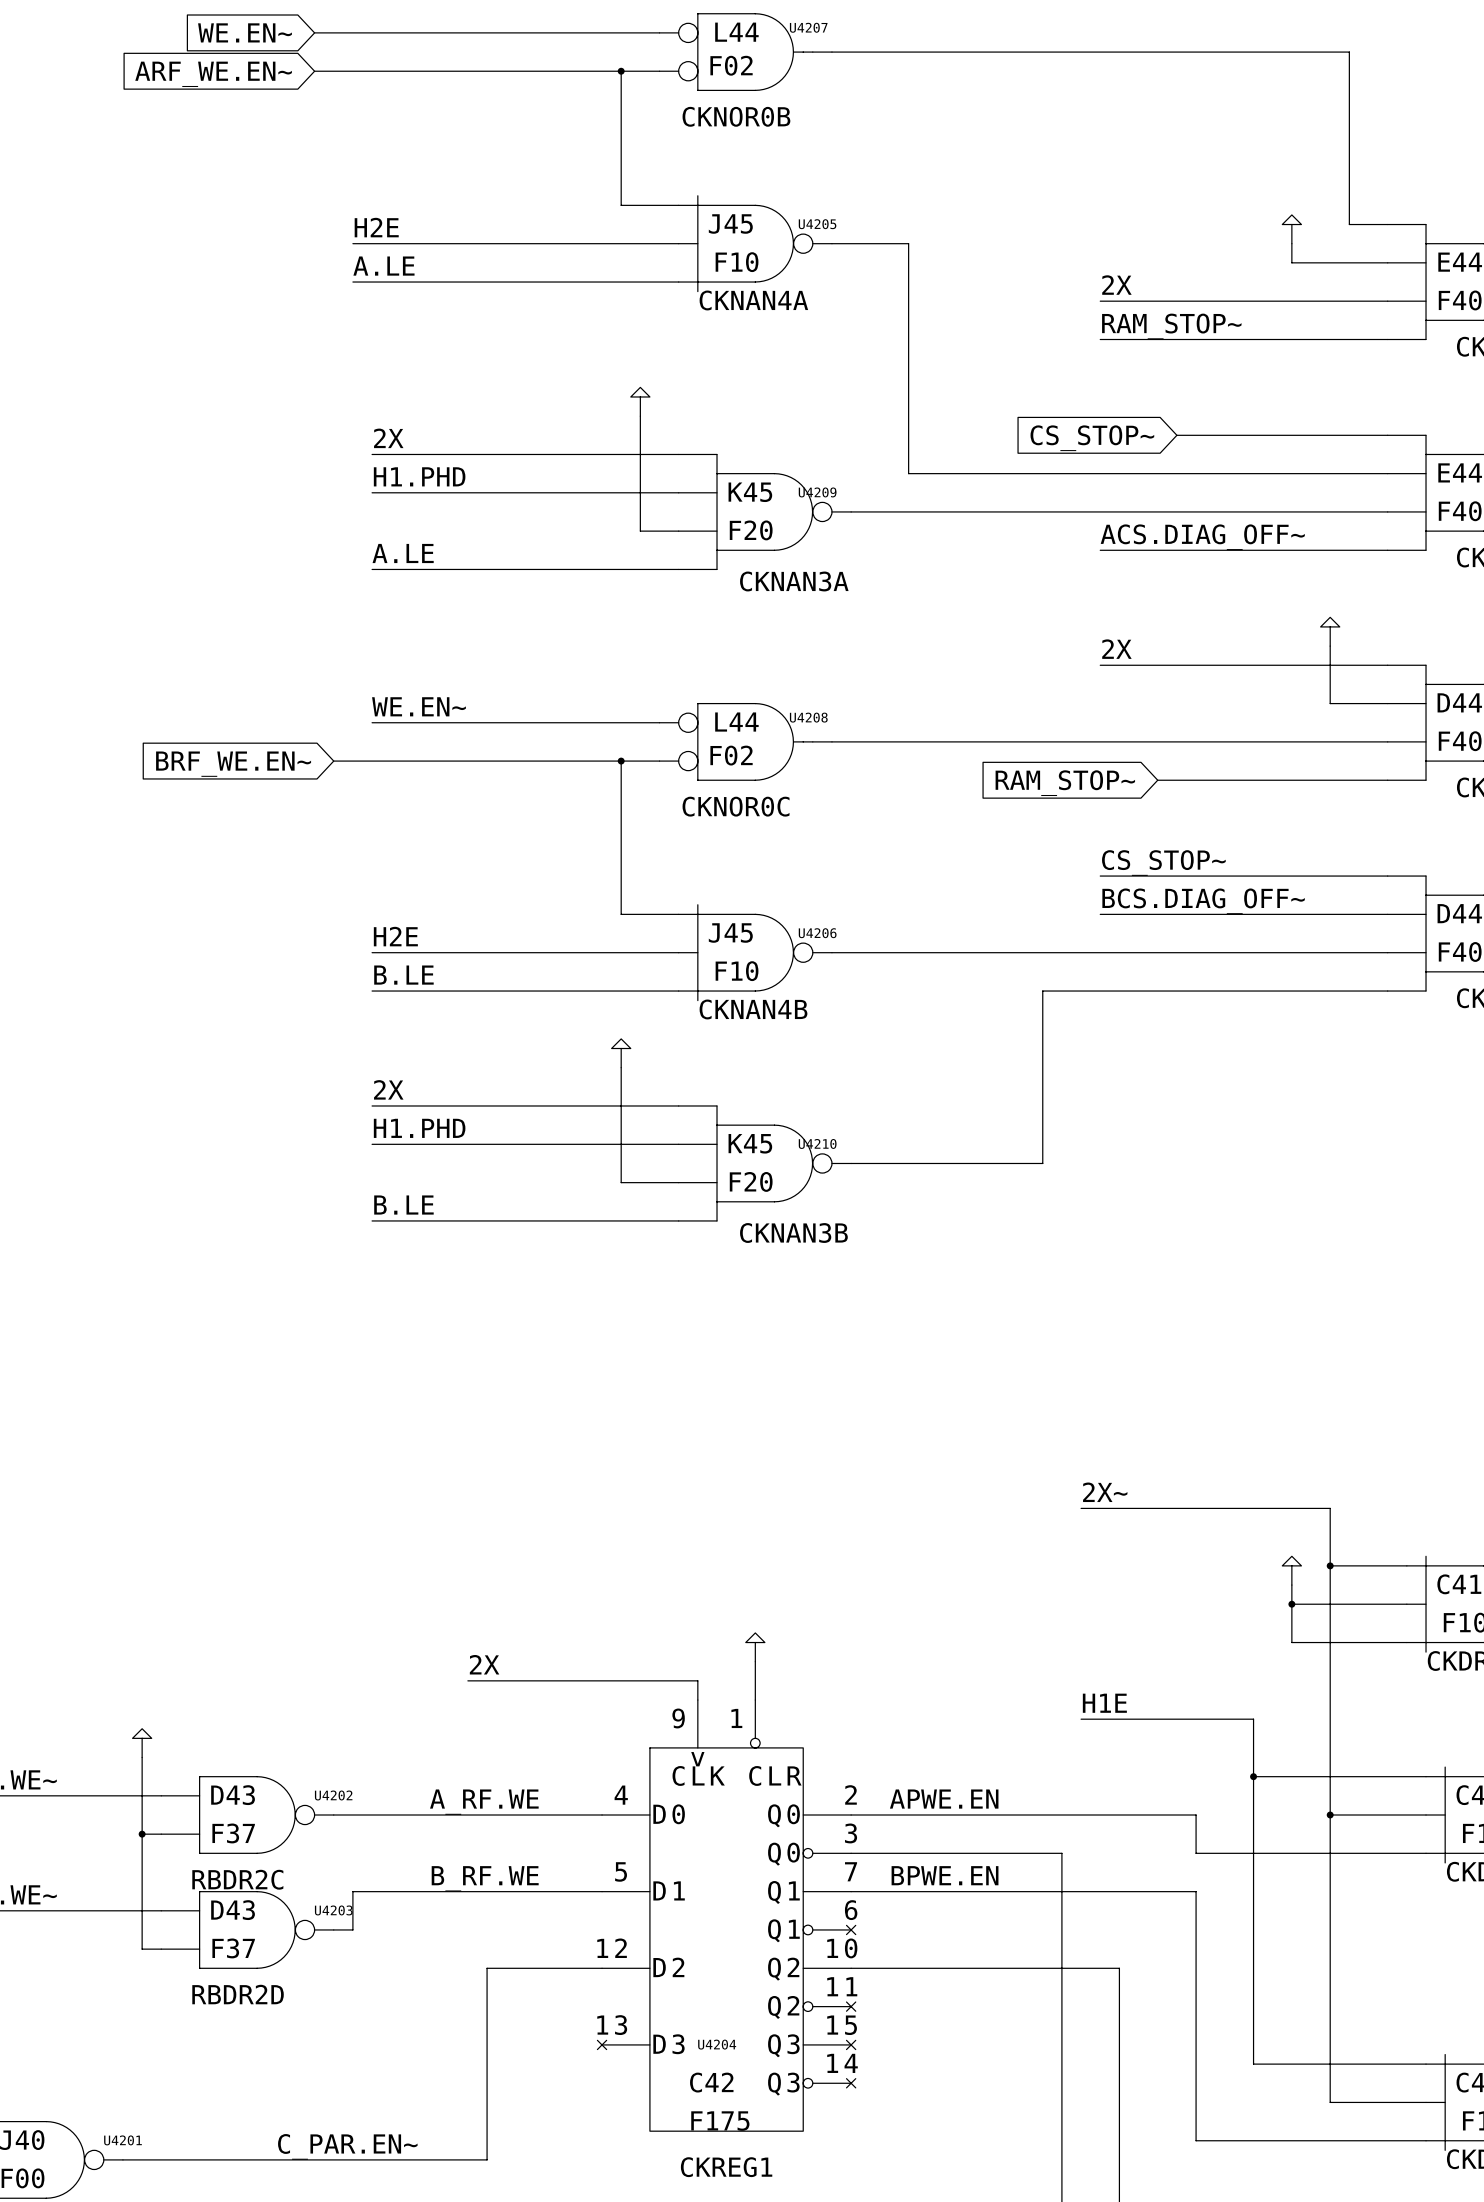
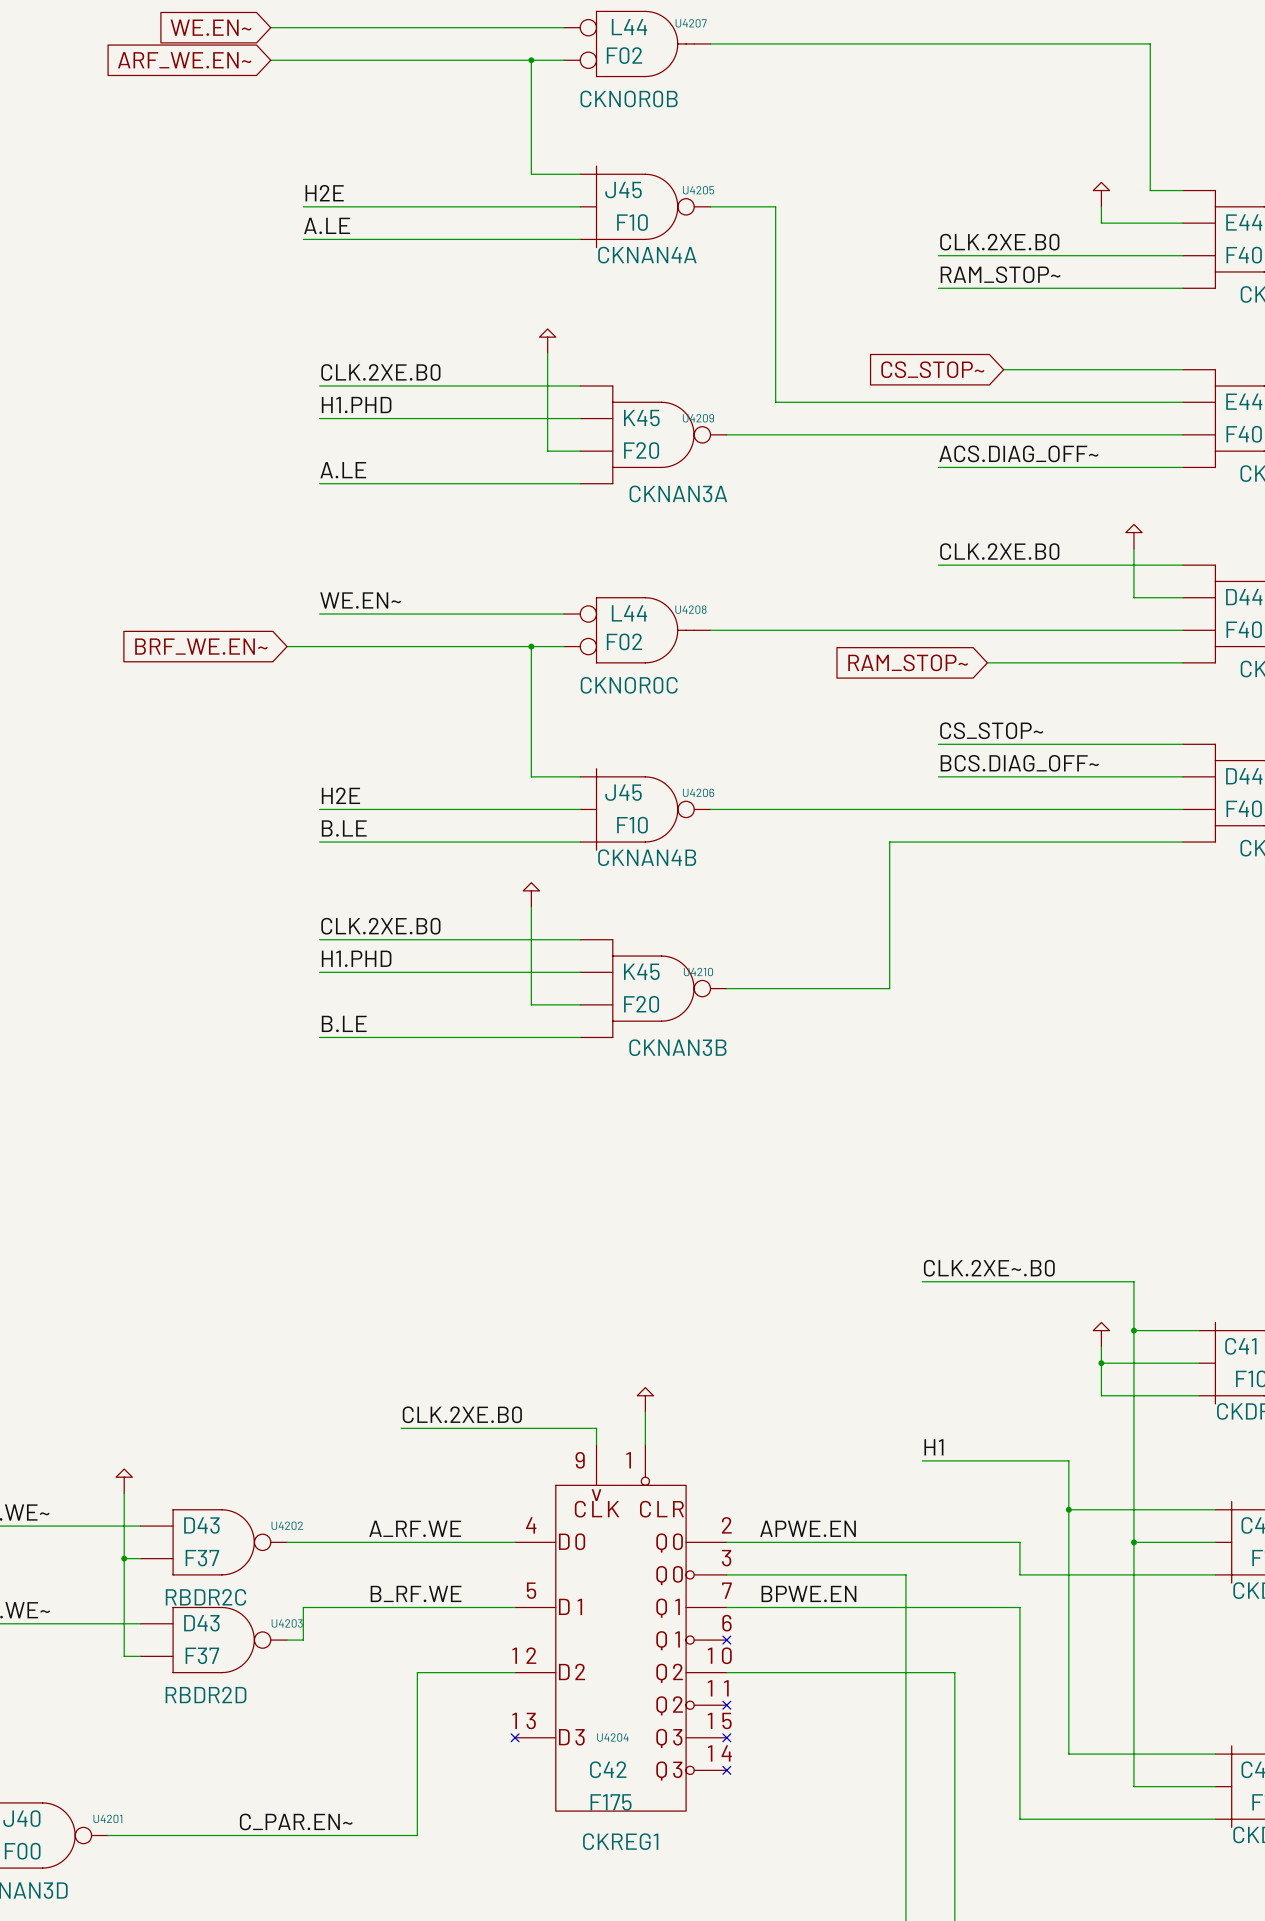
label: 2X (1116, 285) -> CLK.2XE.B0 (999, 242)
label: 2X (388, 438) -> CLK.2XE.B0 (380, 372)
label: 2X (1116, 649) -> CLK.2XE.B0 (999, 551)
label: 2X (388, 1089) -> CLK.2XE.B0 (380, 926)
label: 2X~ (1105, 1492) -> CLK.2XE~.B0 (989, 1268)
label: 2X (484, 1664) -> CLK.2XE.B0 (462, 1414)
label: H1E (1104, 1703) -> H1 (933, 1447)

